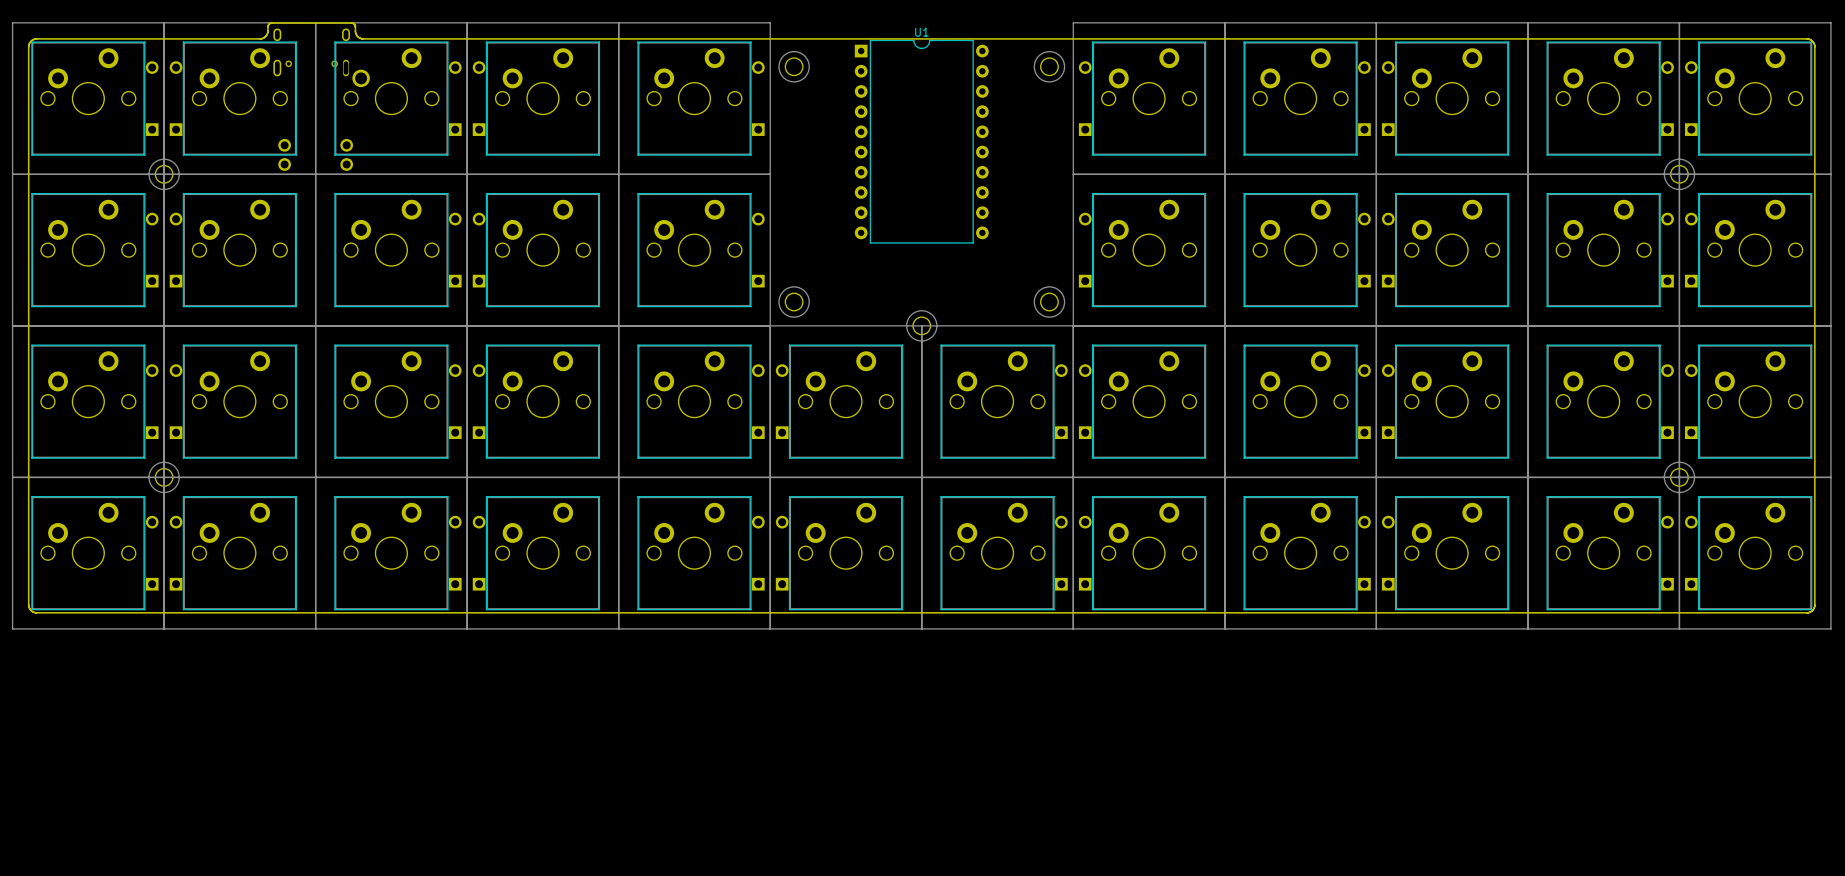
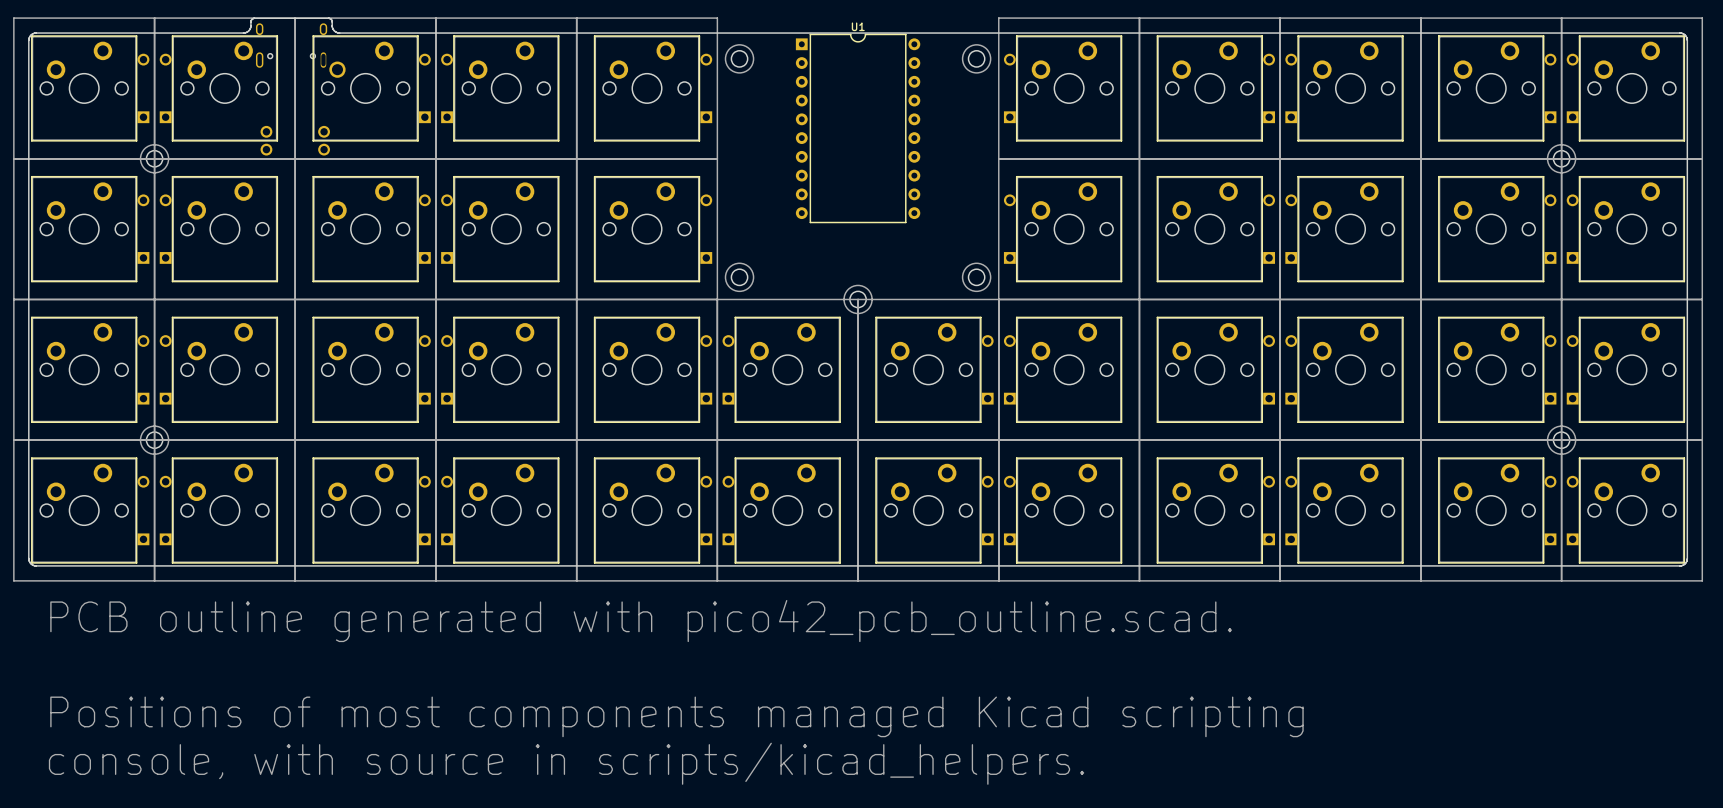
text: none -> PCB outline generated with pico42_pcb_outline.scad. (641, 621)
text: none -> Positions of most components managed Kicad scripting (676, 716)
text: none -> console, with source in scripts/kicad_helpers. (566, 763)

